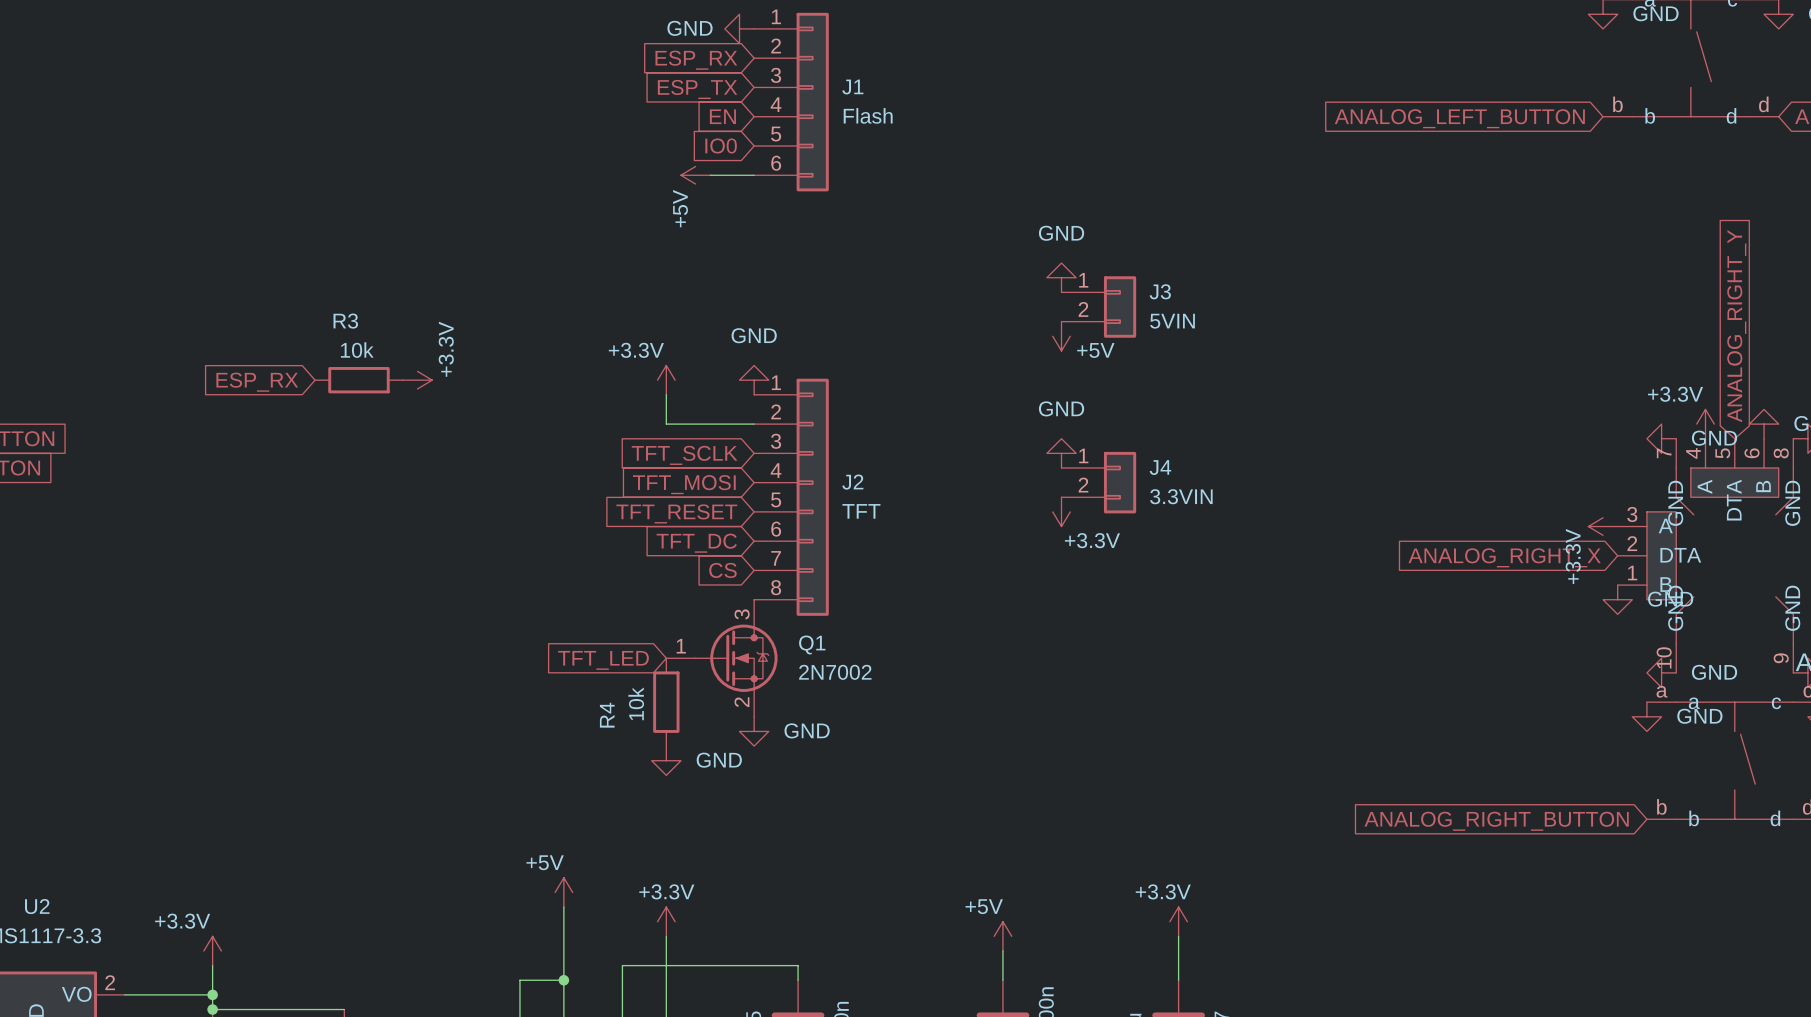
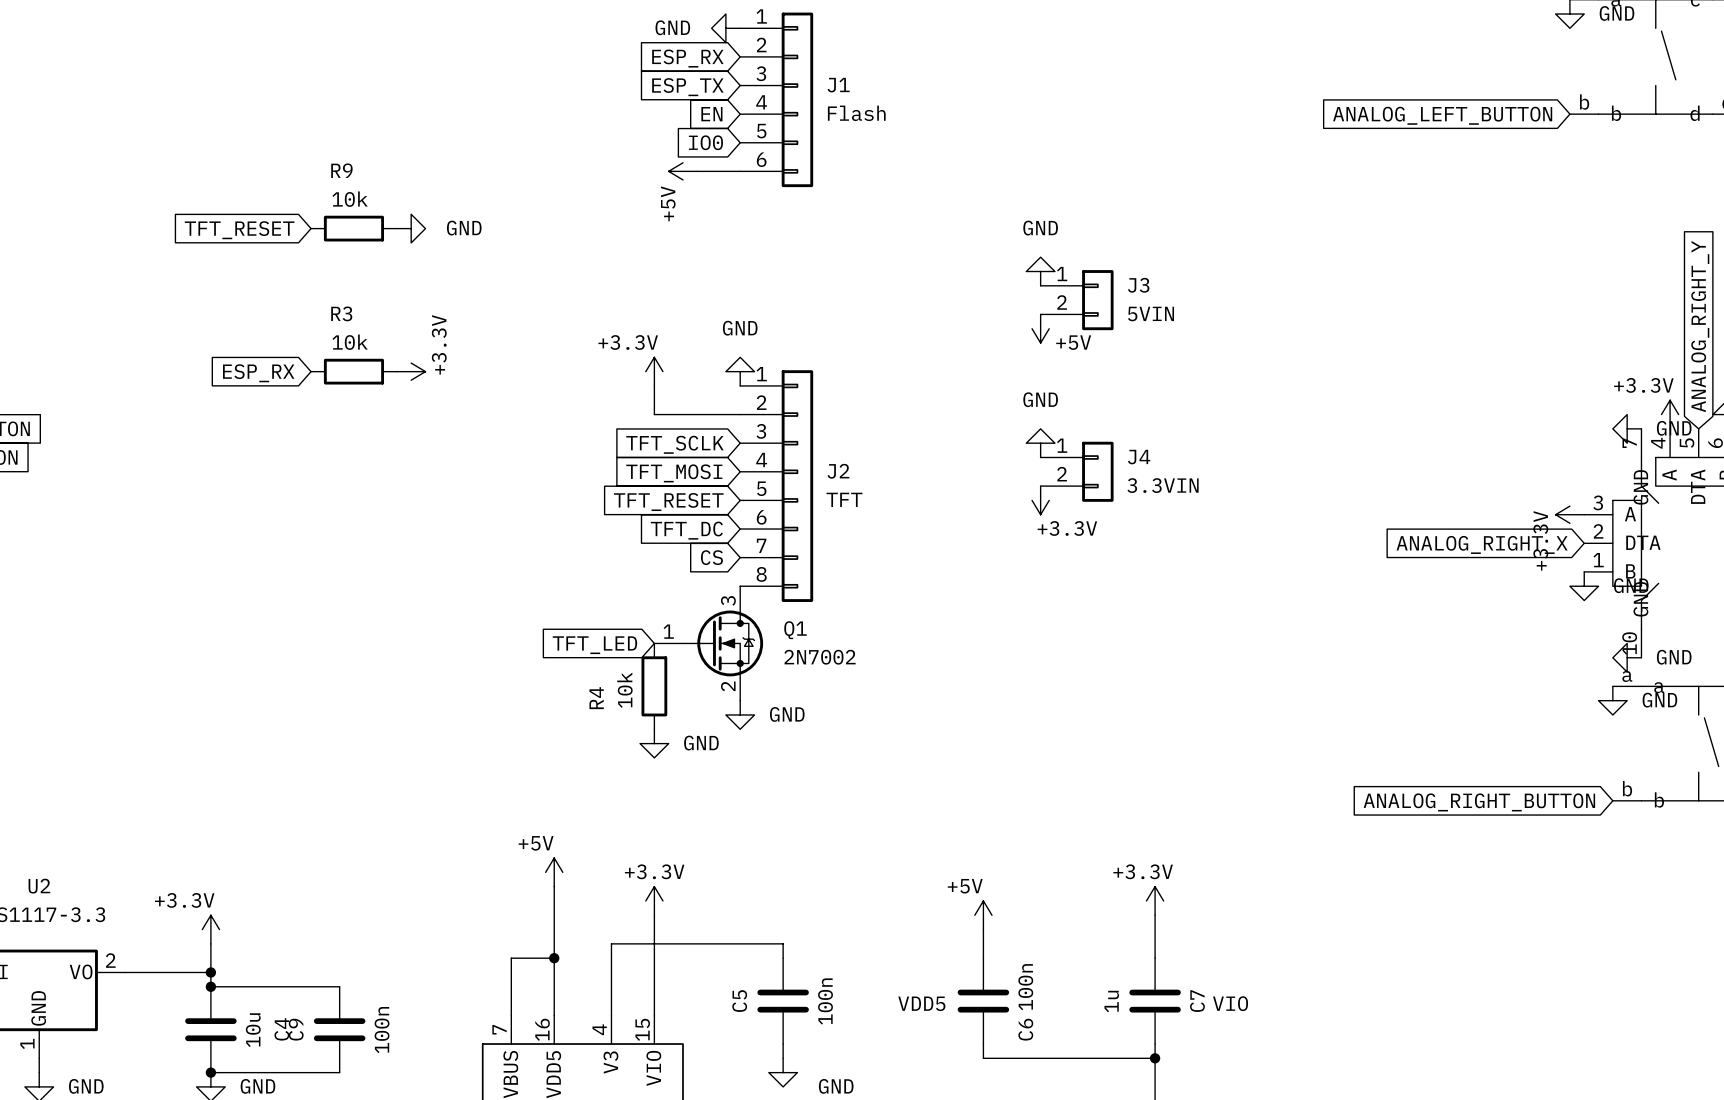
R9: none -> 10k (353, 228)
power symbol: none -> GND (411, 228)
global label: none -> TFT_RESET (239, 230)

